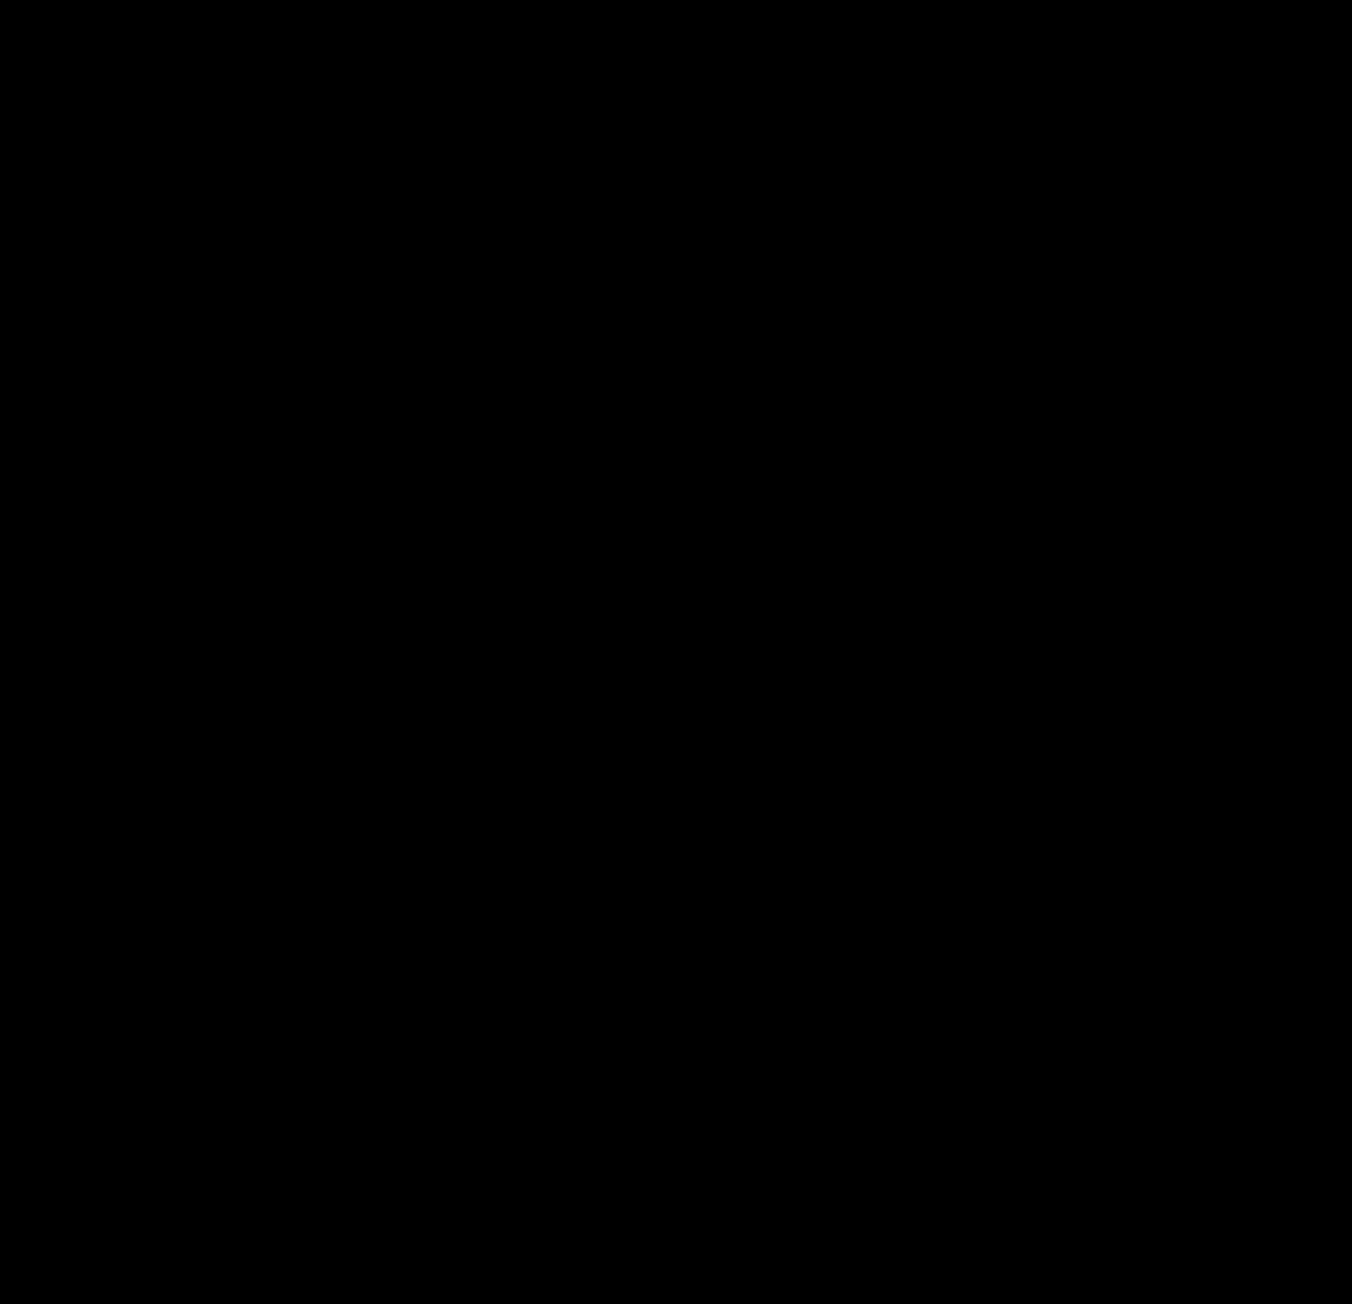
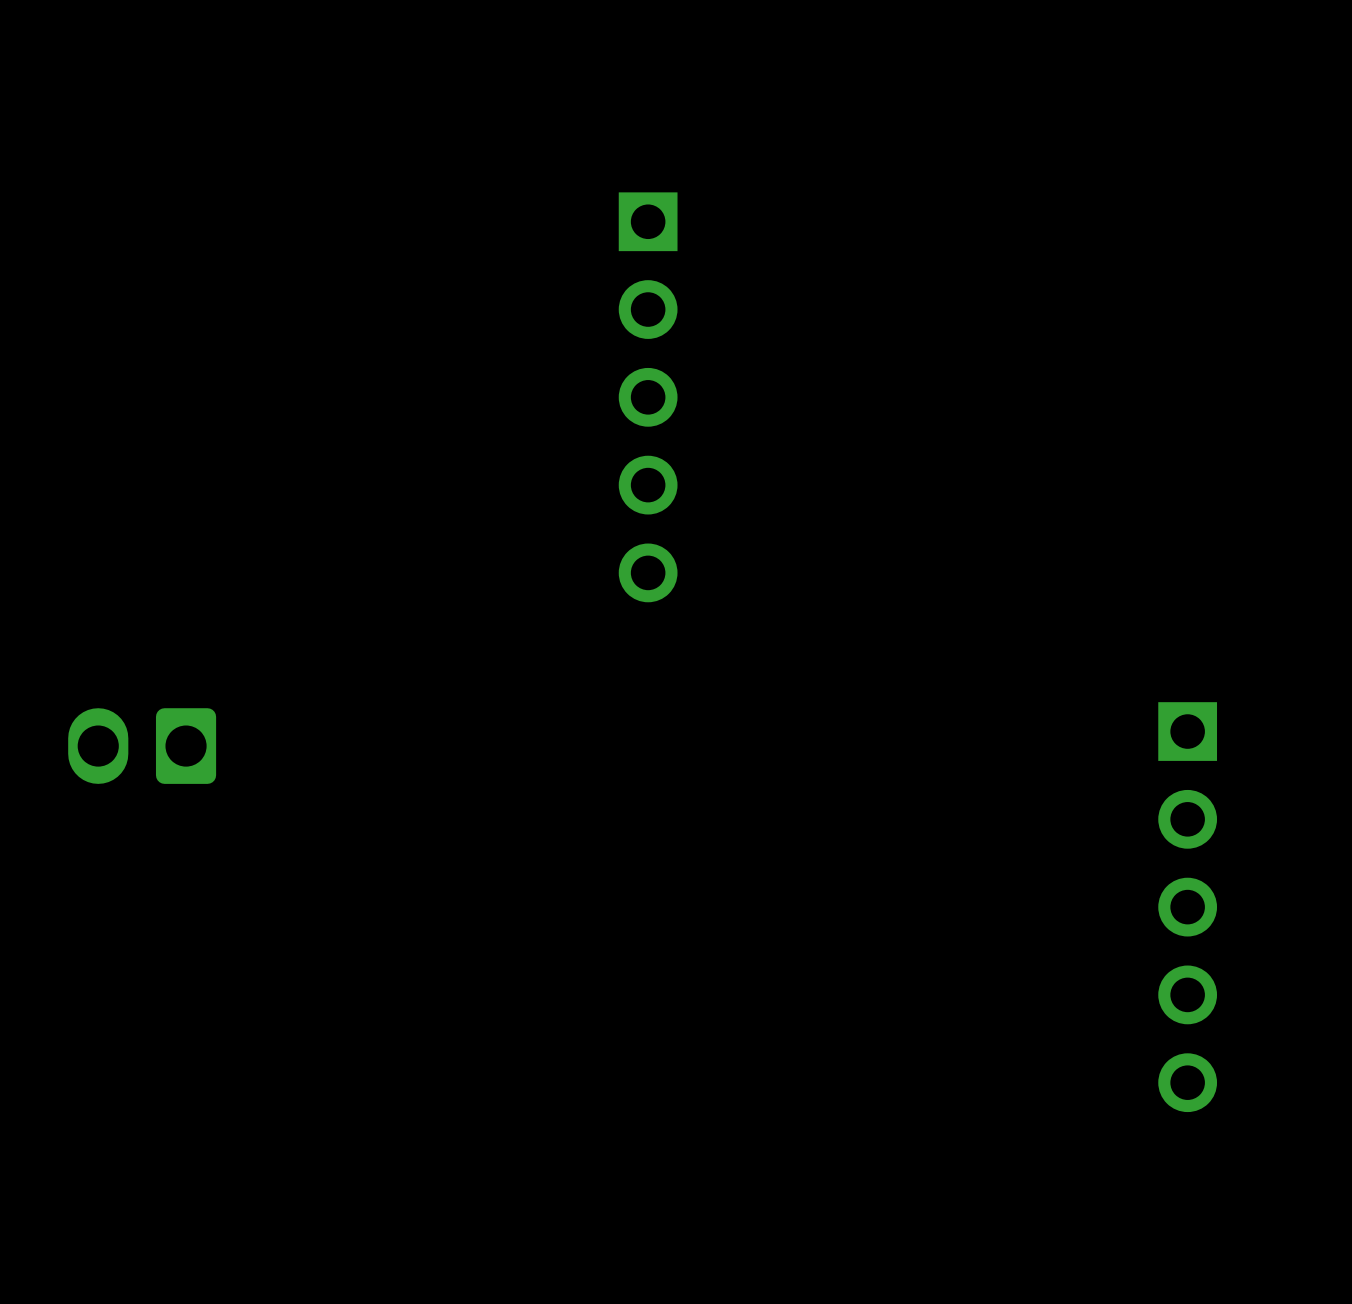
part: none -> (648, 397)
part: none -> (142, 746)
part: none -> (1187, 907)

